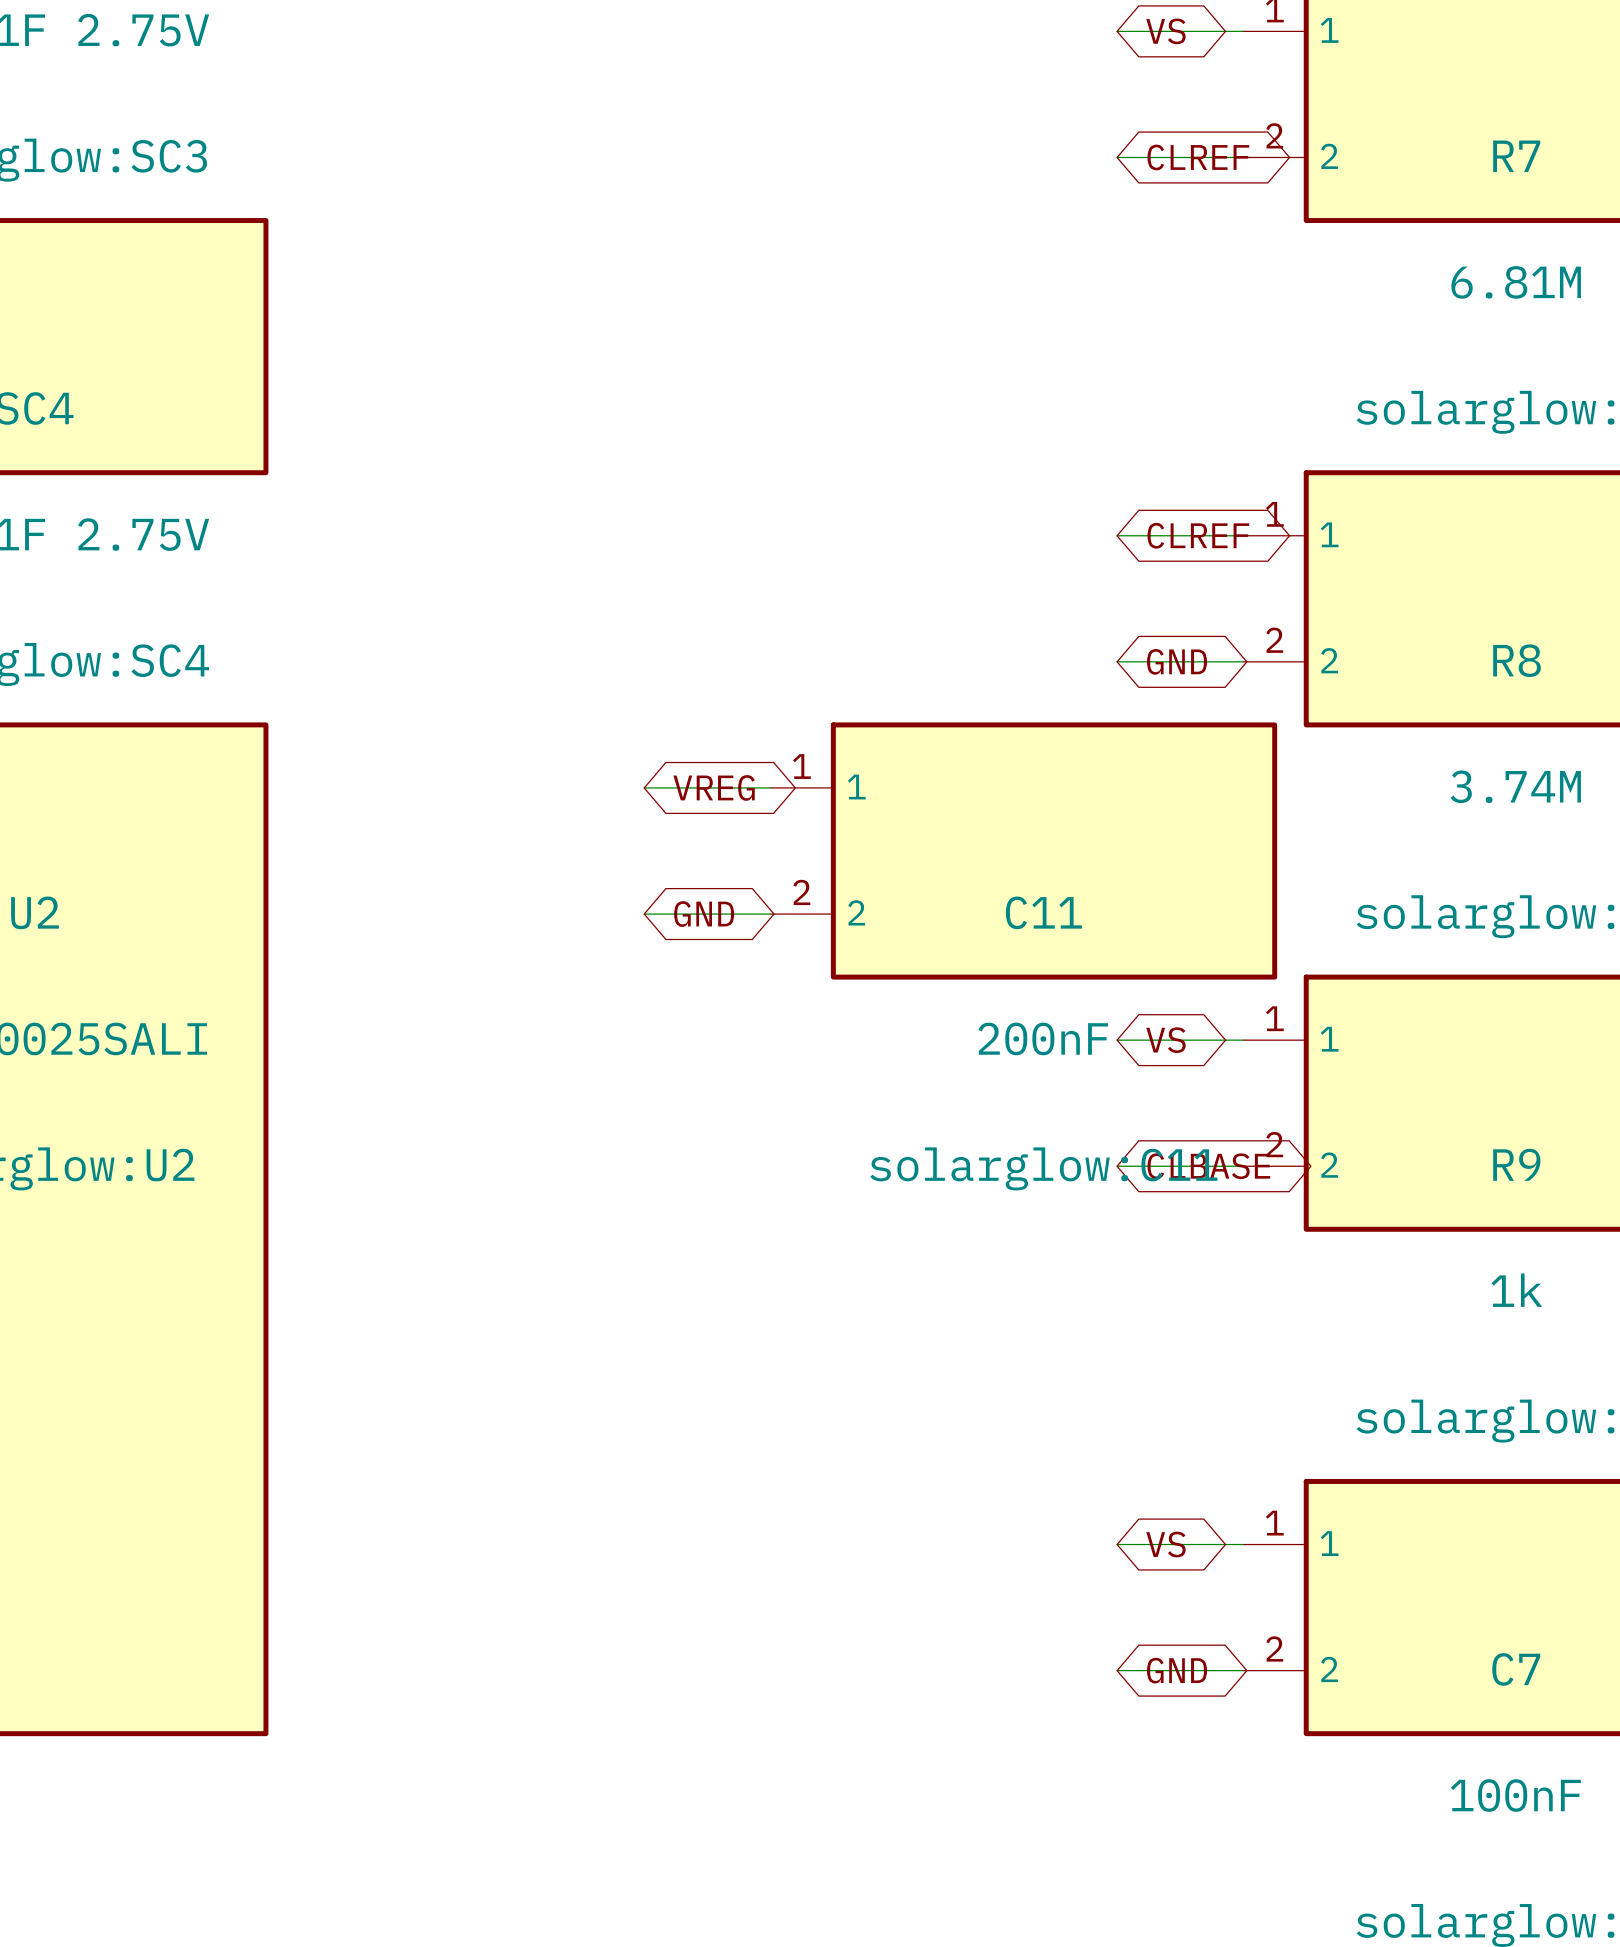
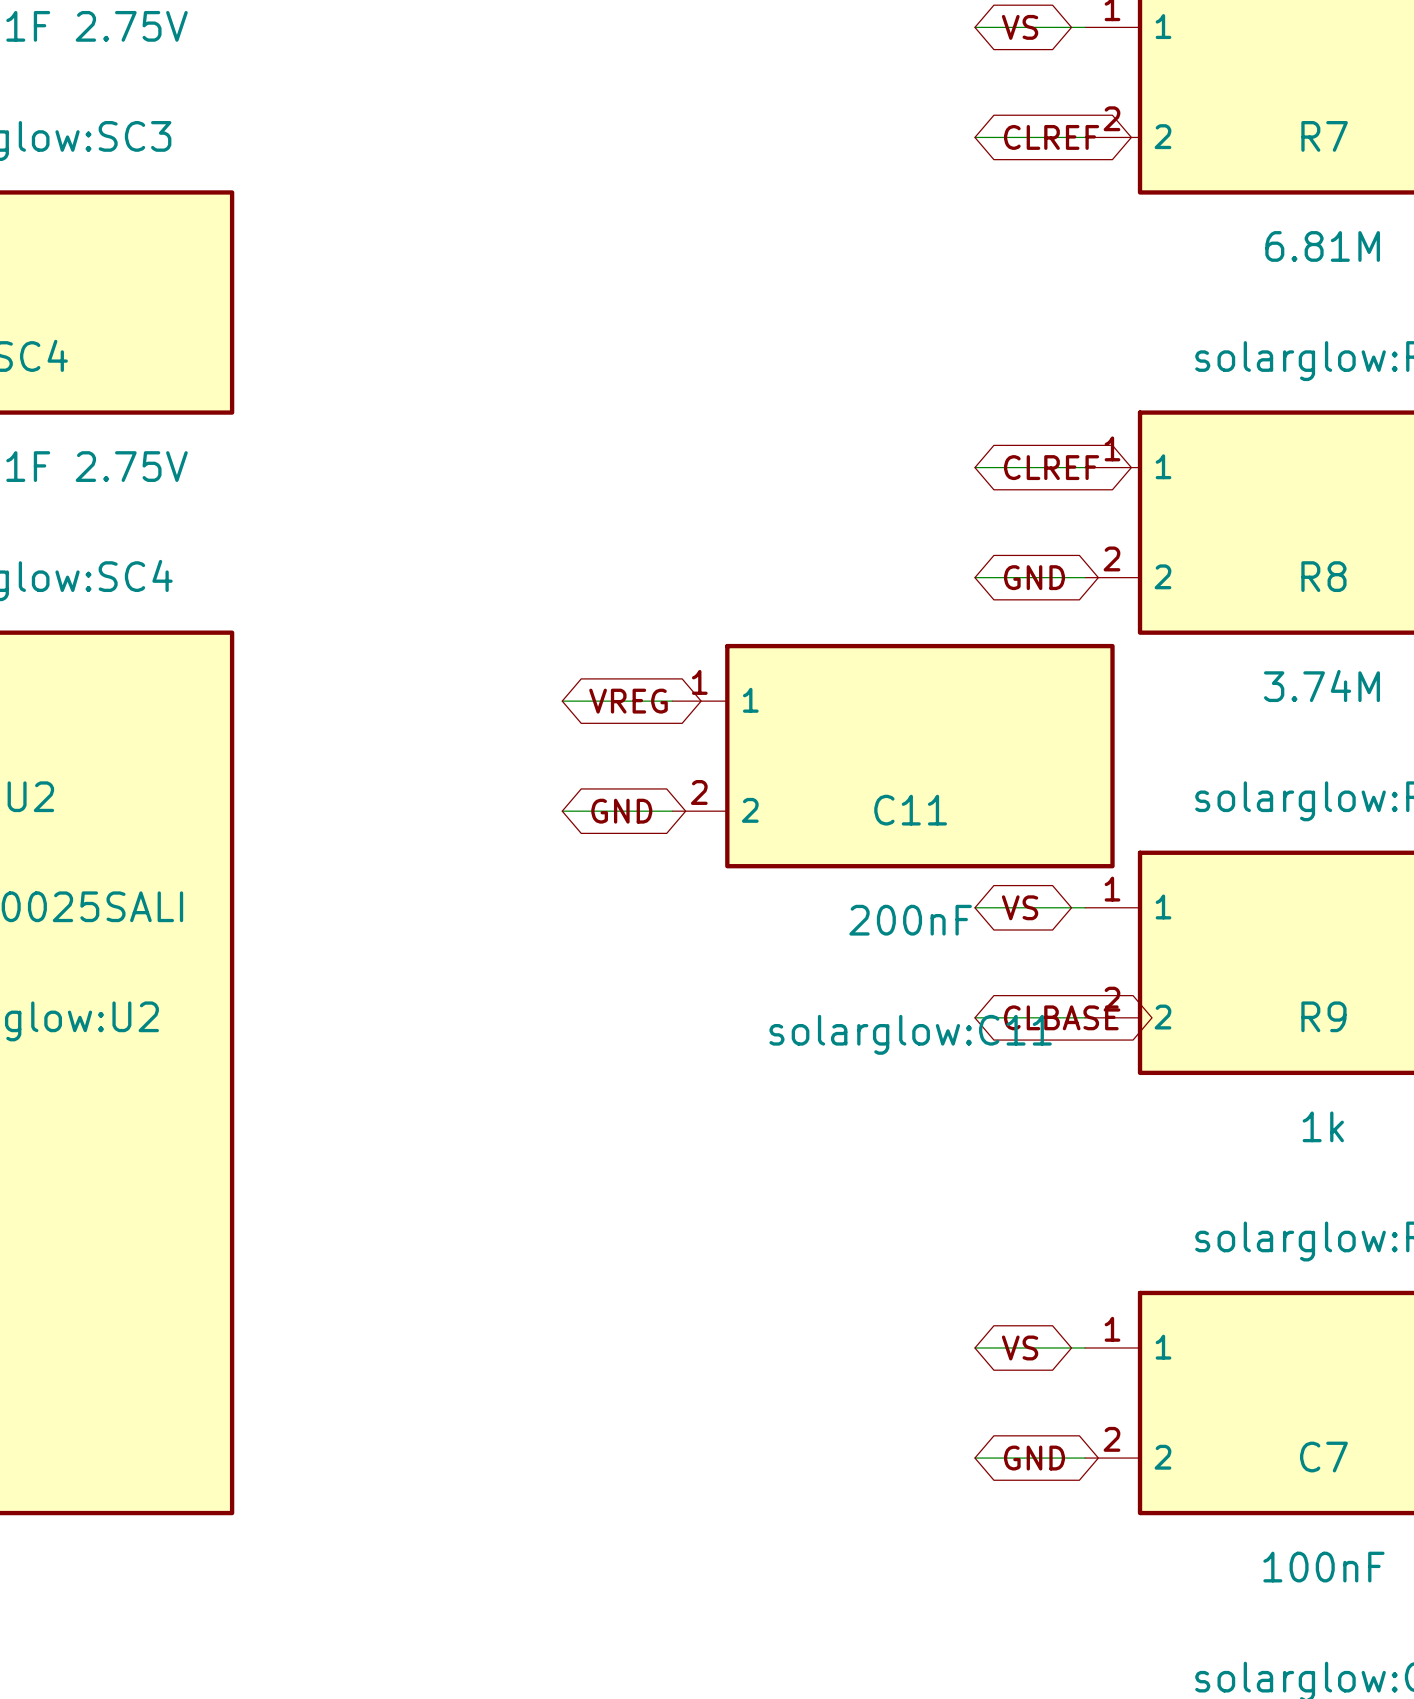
wire: (644, 787) (770, 787) -> (562, 701) (672, 701)
global label position: VREG (714, 787) -> VREG (628, 701)
C11 position: (1023, 851) -> (893, 756)
wire: (644, 914) (770, 914) -> (562, 811) (672, 811)
global label position: GND (704, 914) -> GND (621, 811)

